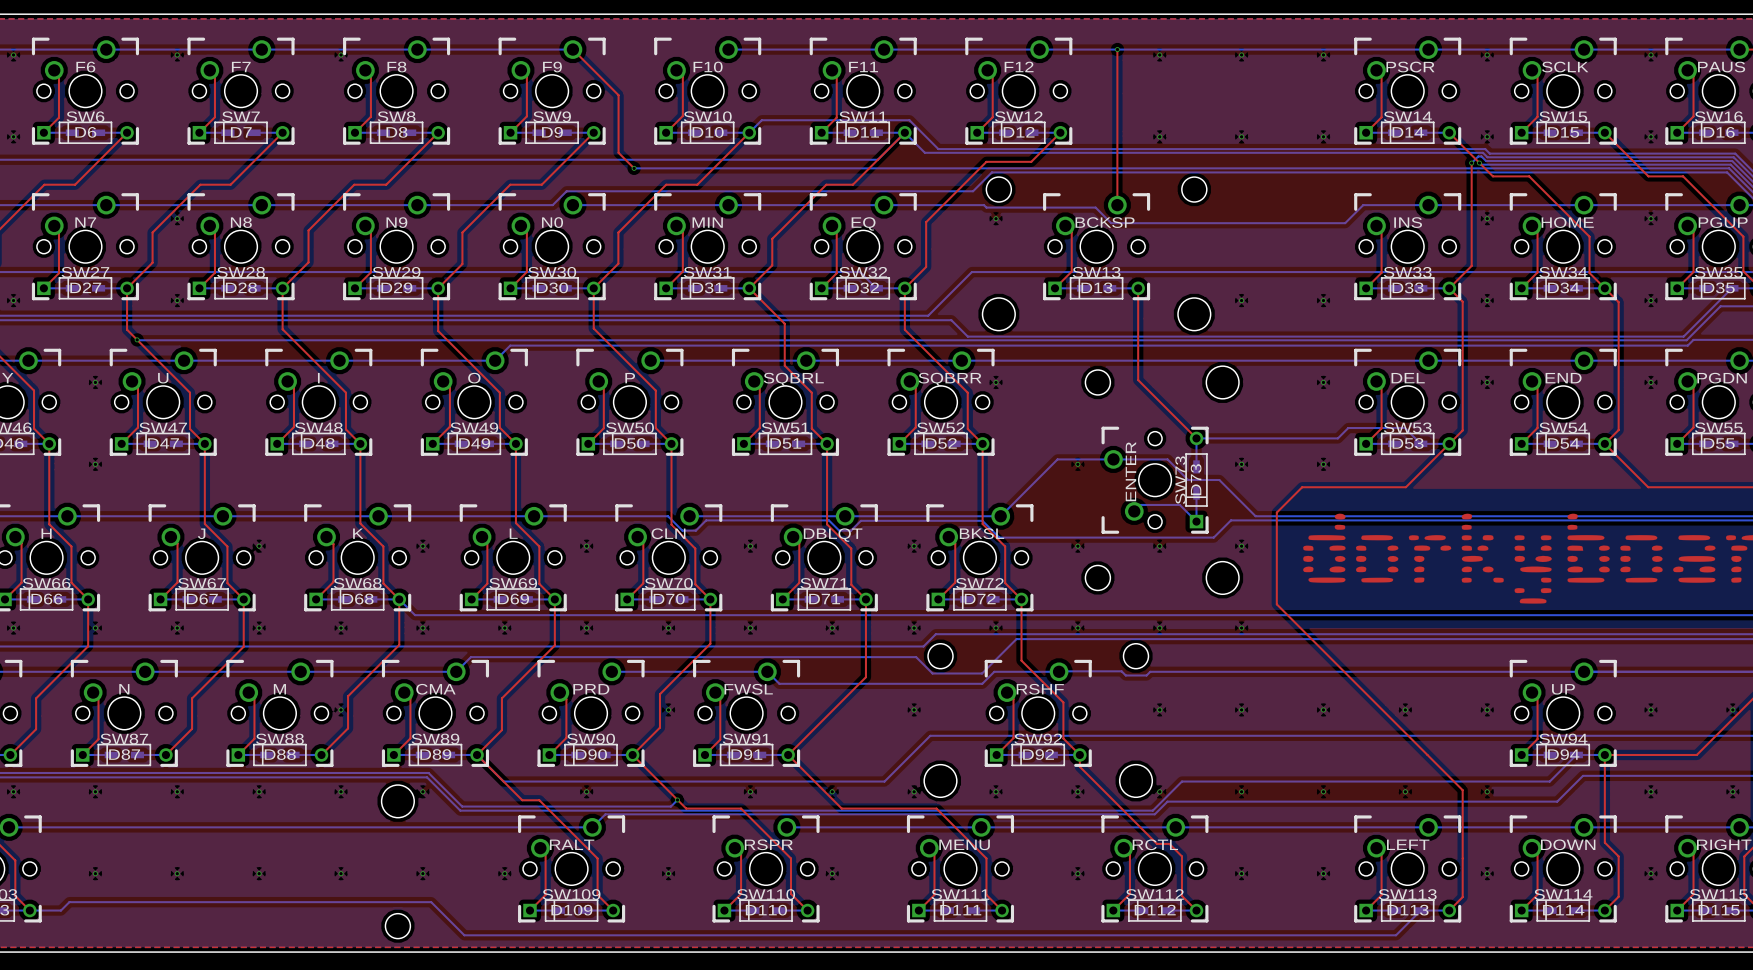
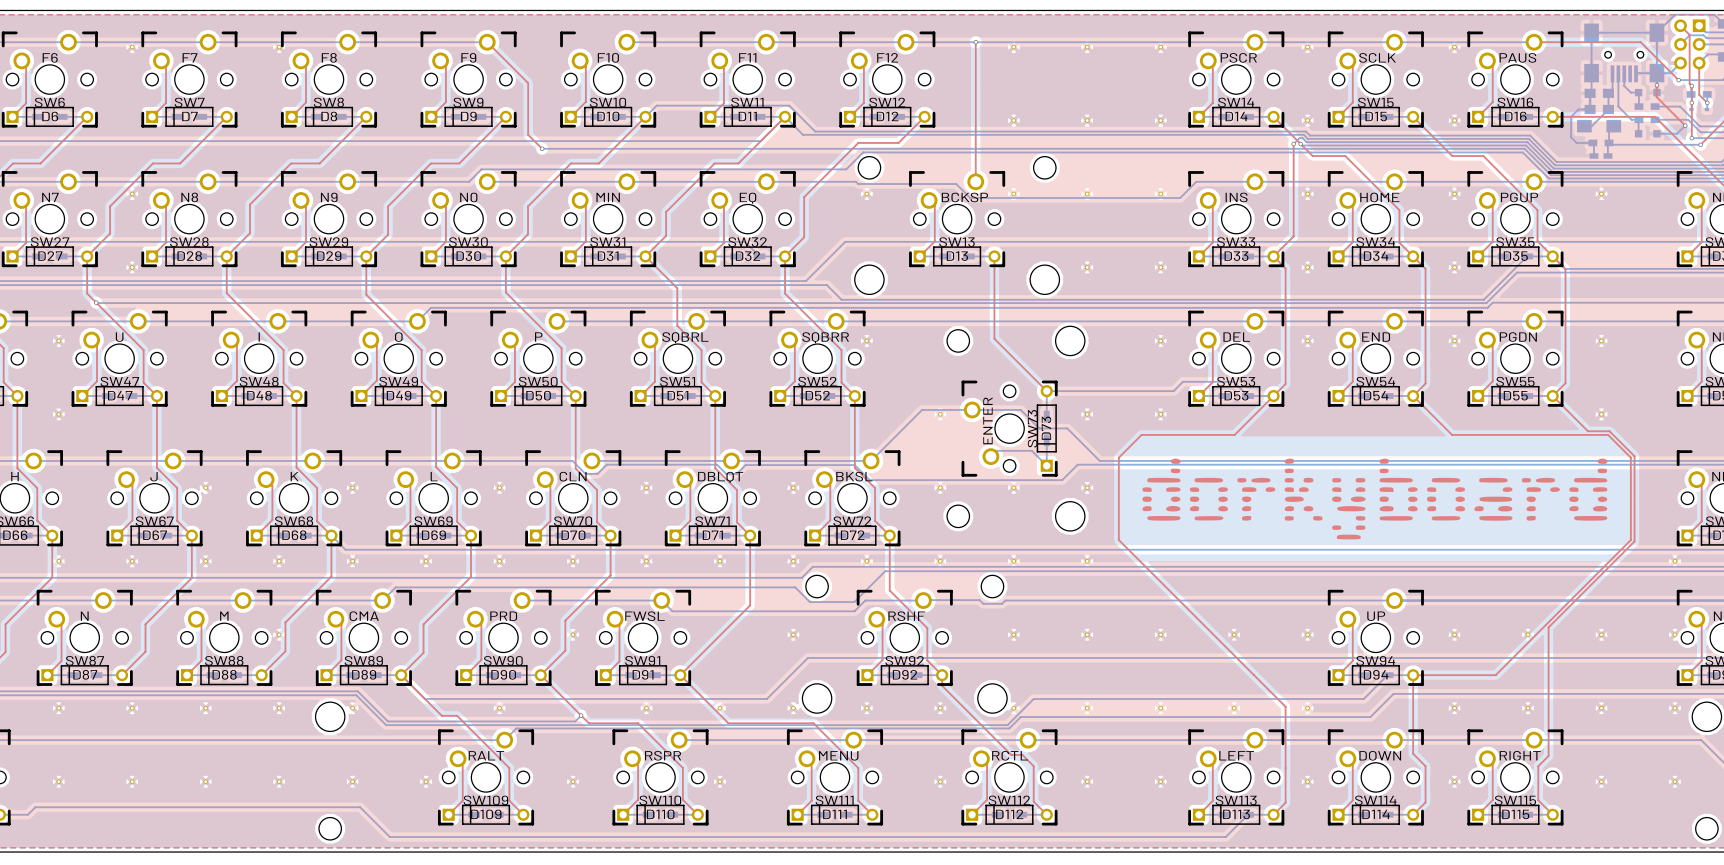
part: none -> (1013, 193)
part: none -> (1087, 193)
part: none -> (1160, 193)

